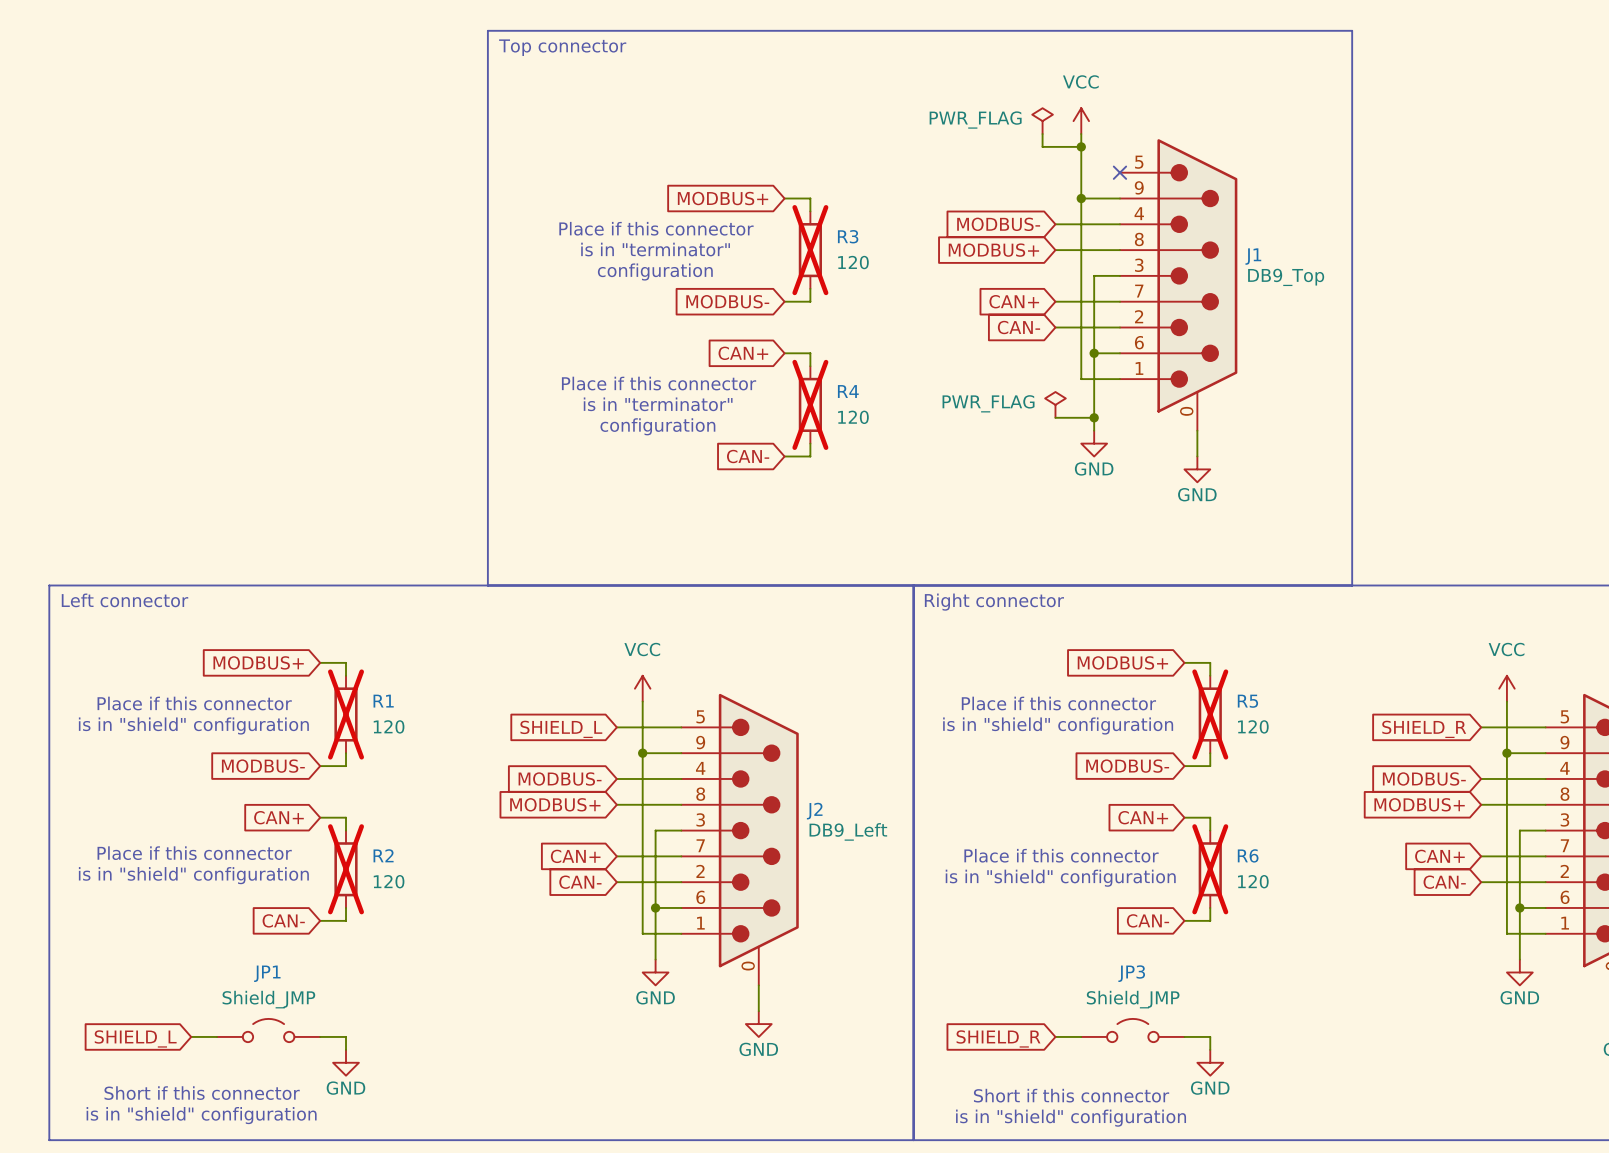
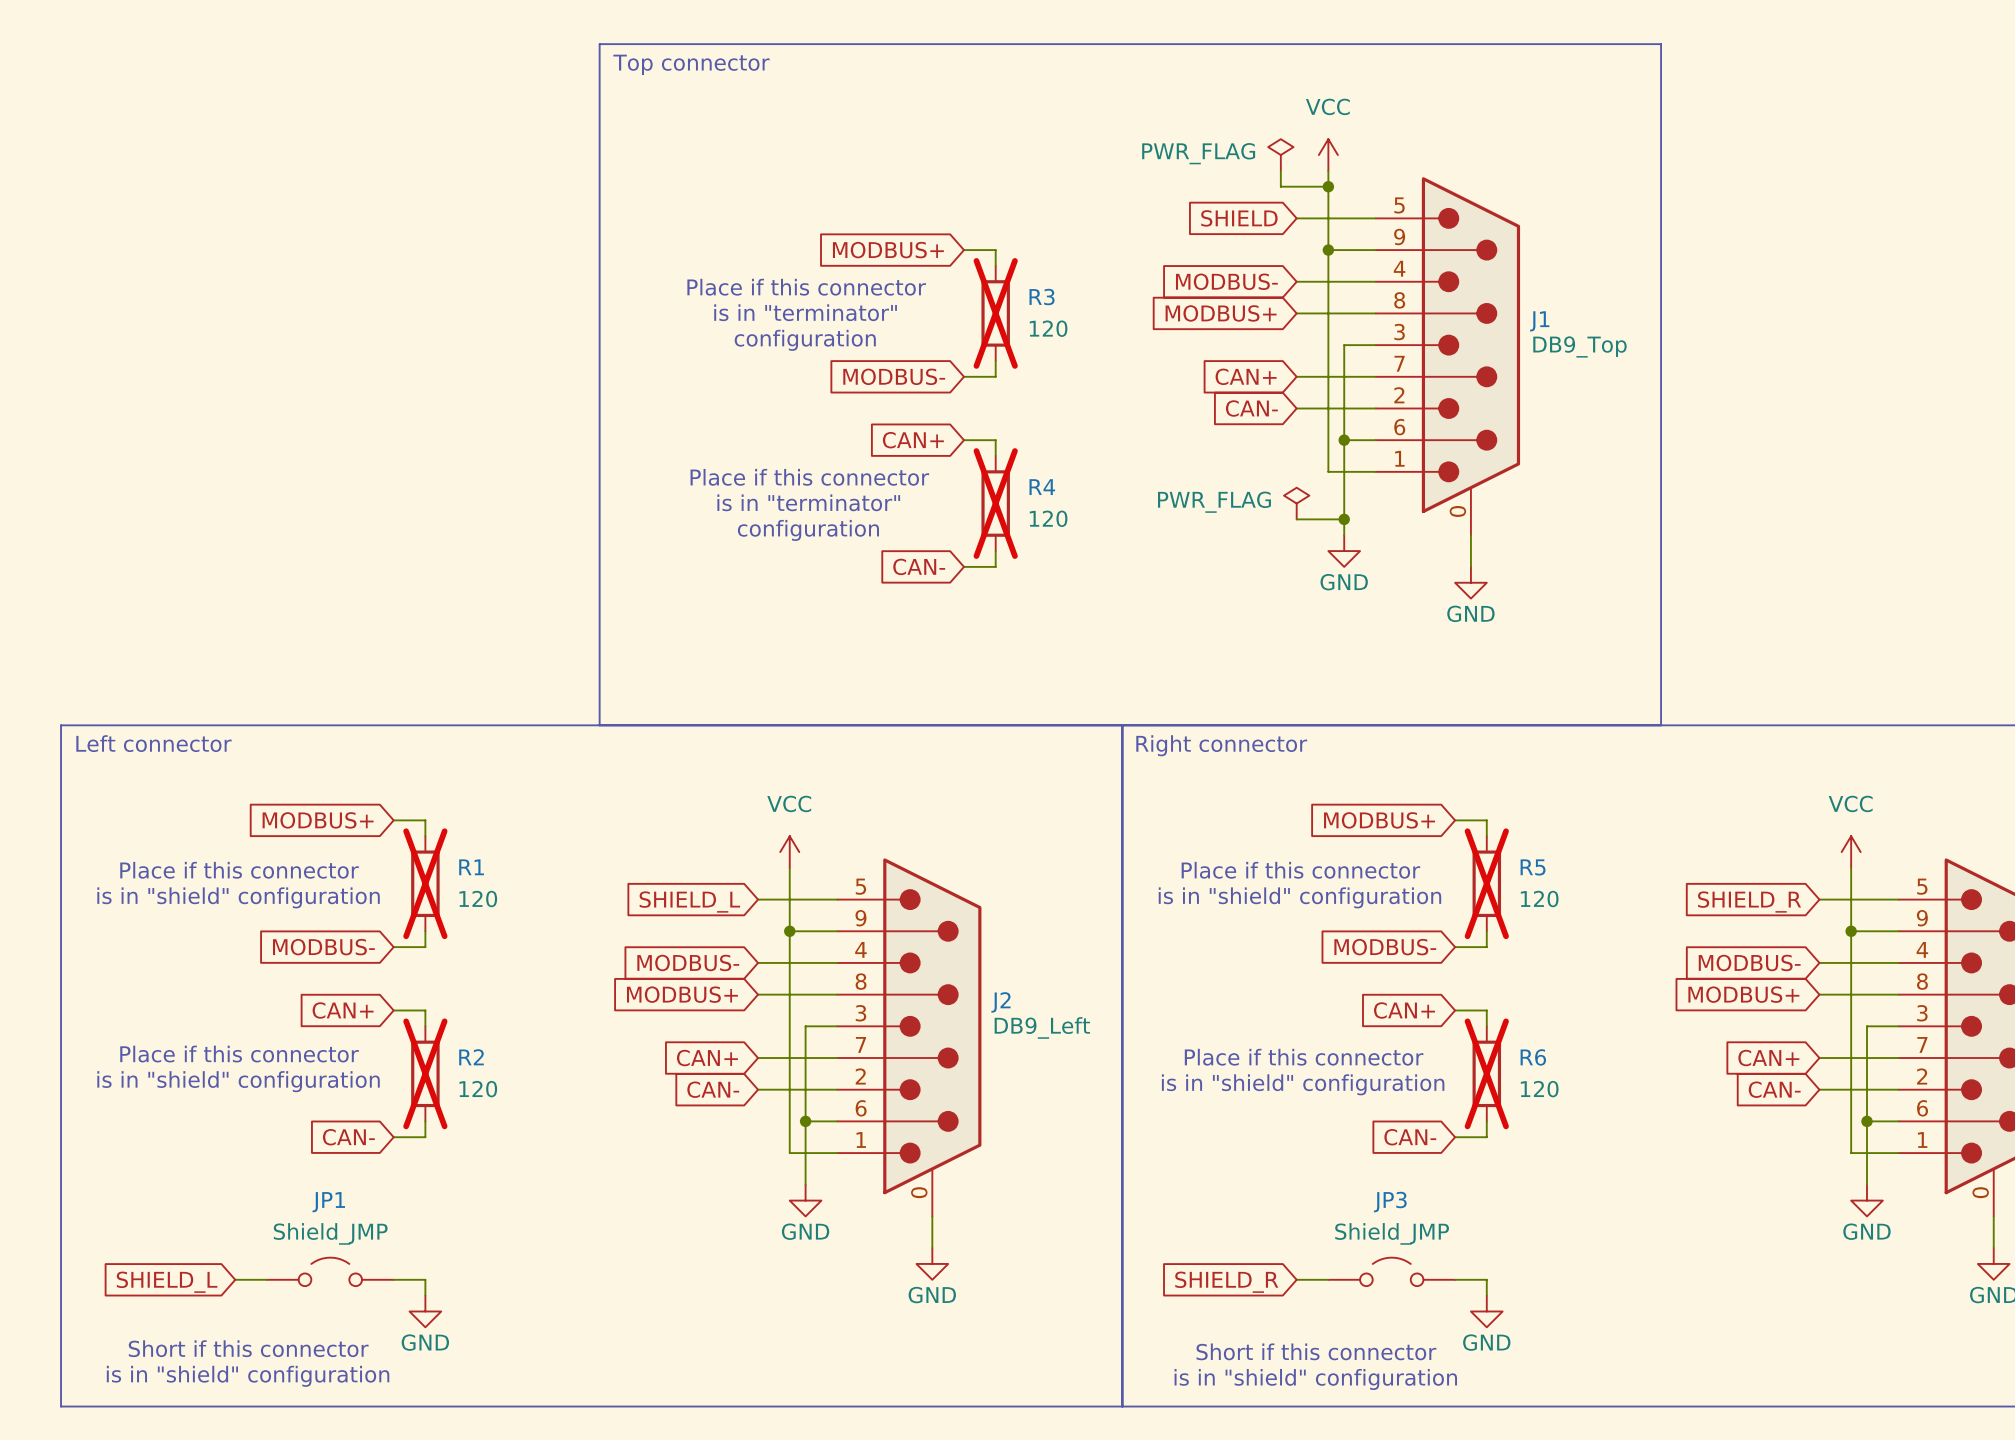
global label: none -> SHIELD (1239, 218)
wire: none -> (1296, 218) (1375, 218)
no-connect mark: (1119, 172) -> none

